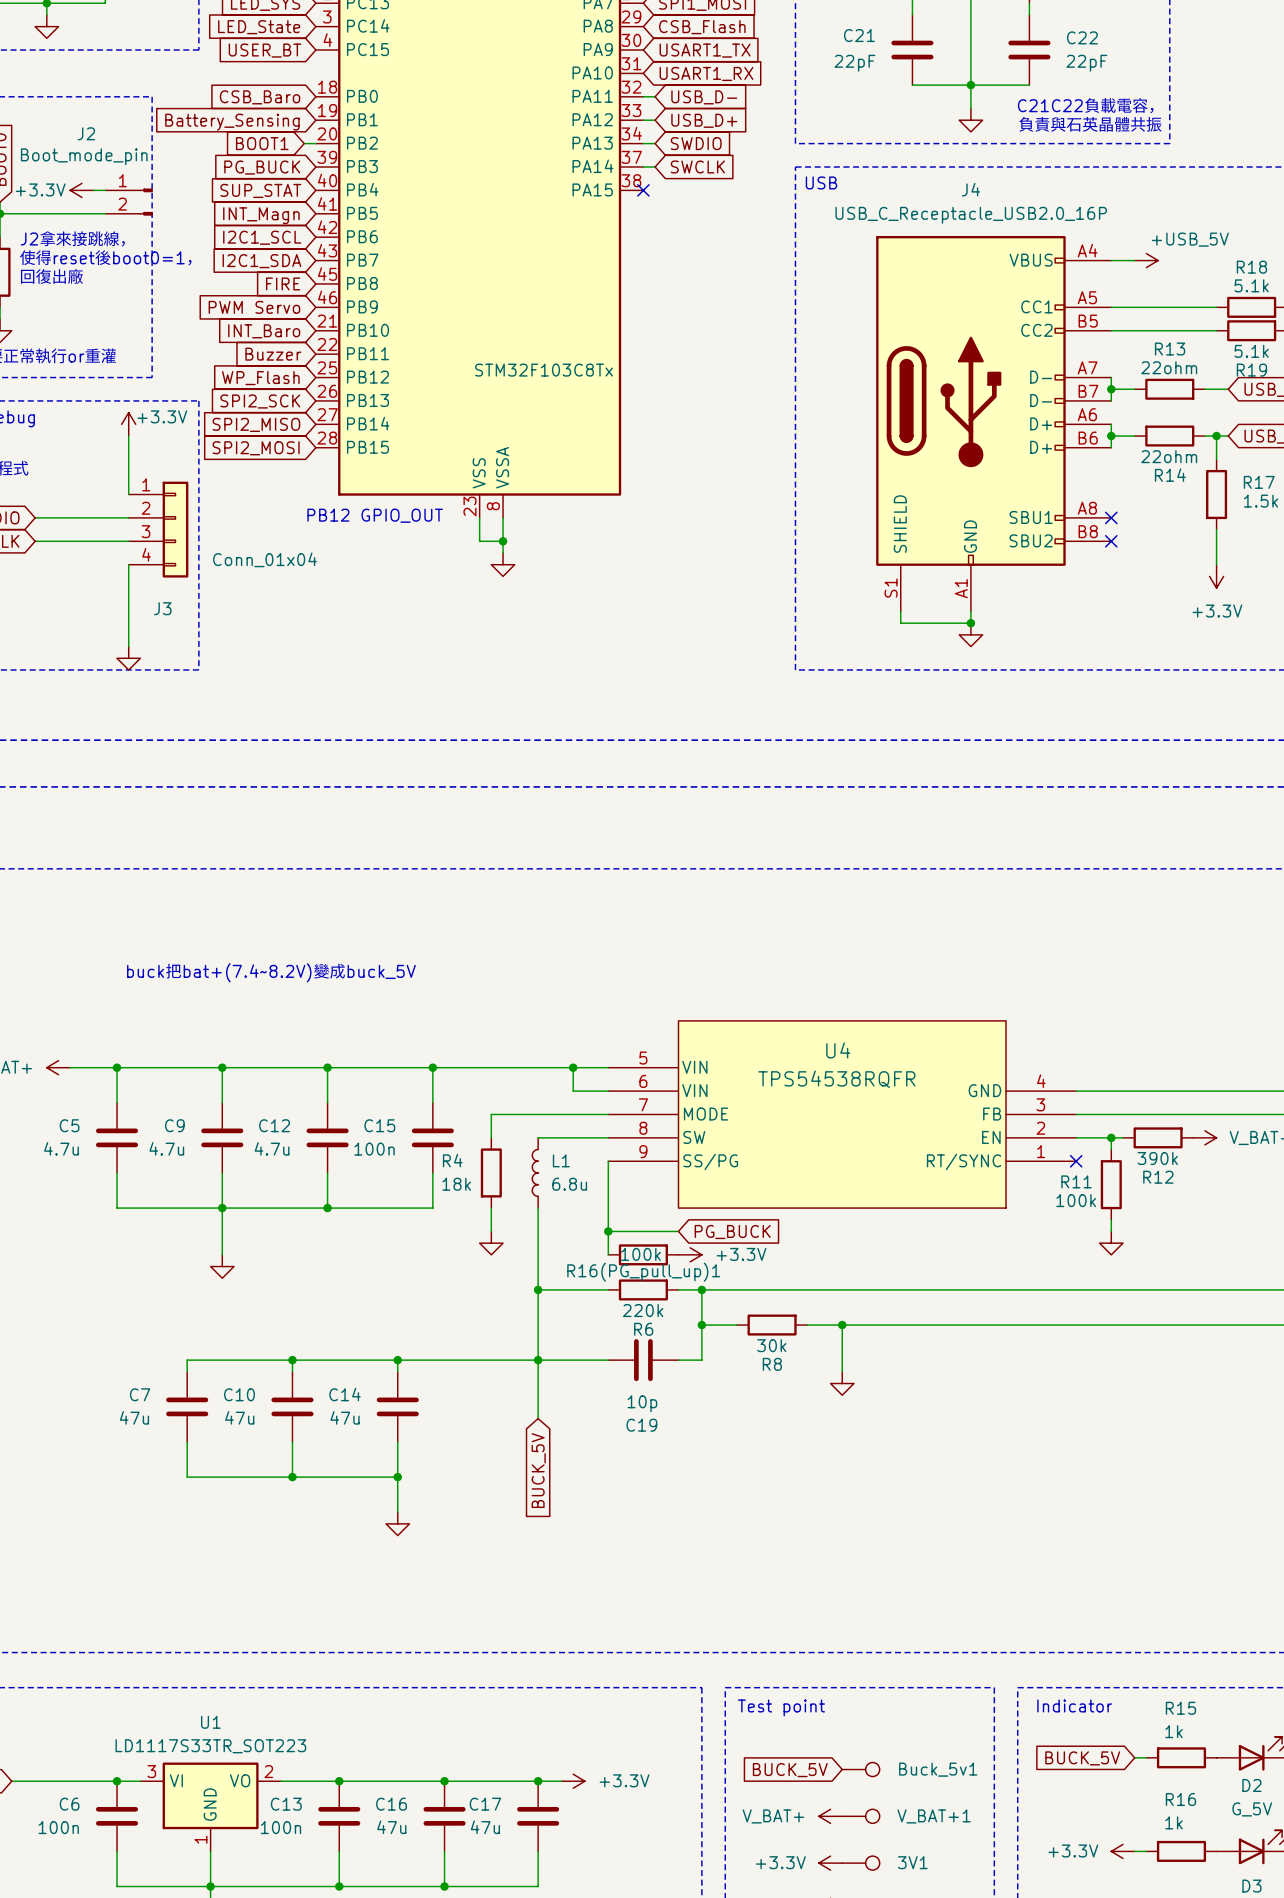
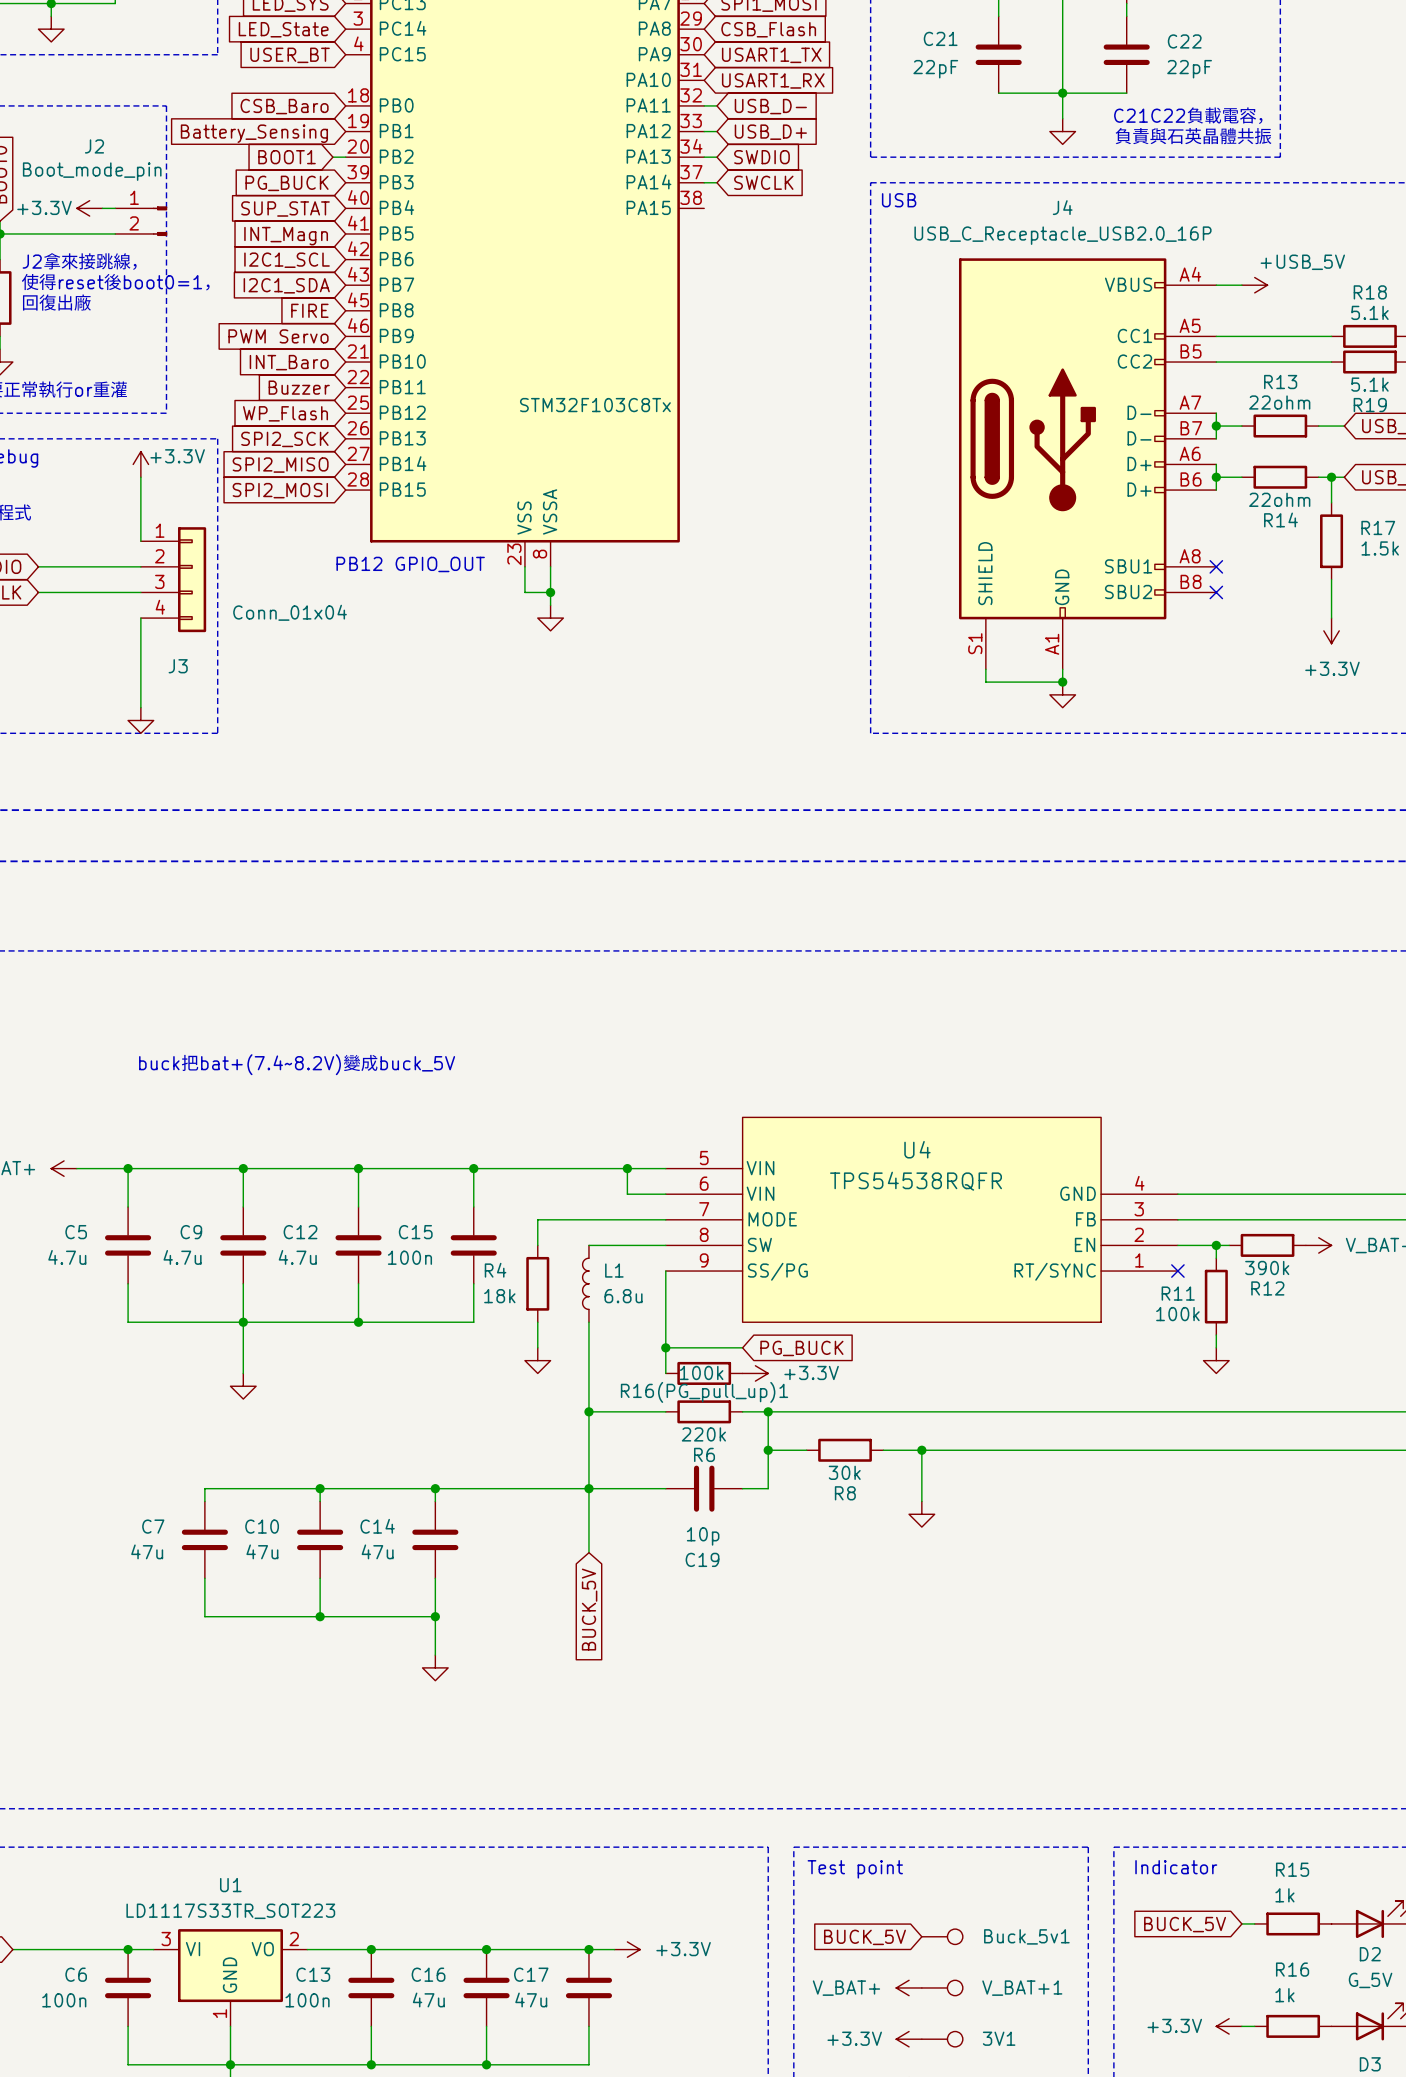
no-connect mark: (643, 190) -> none

